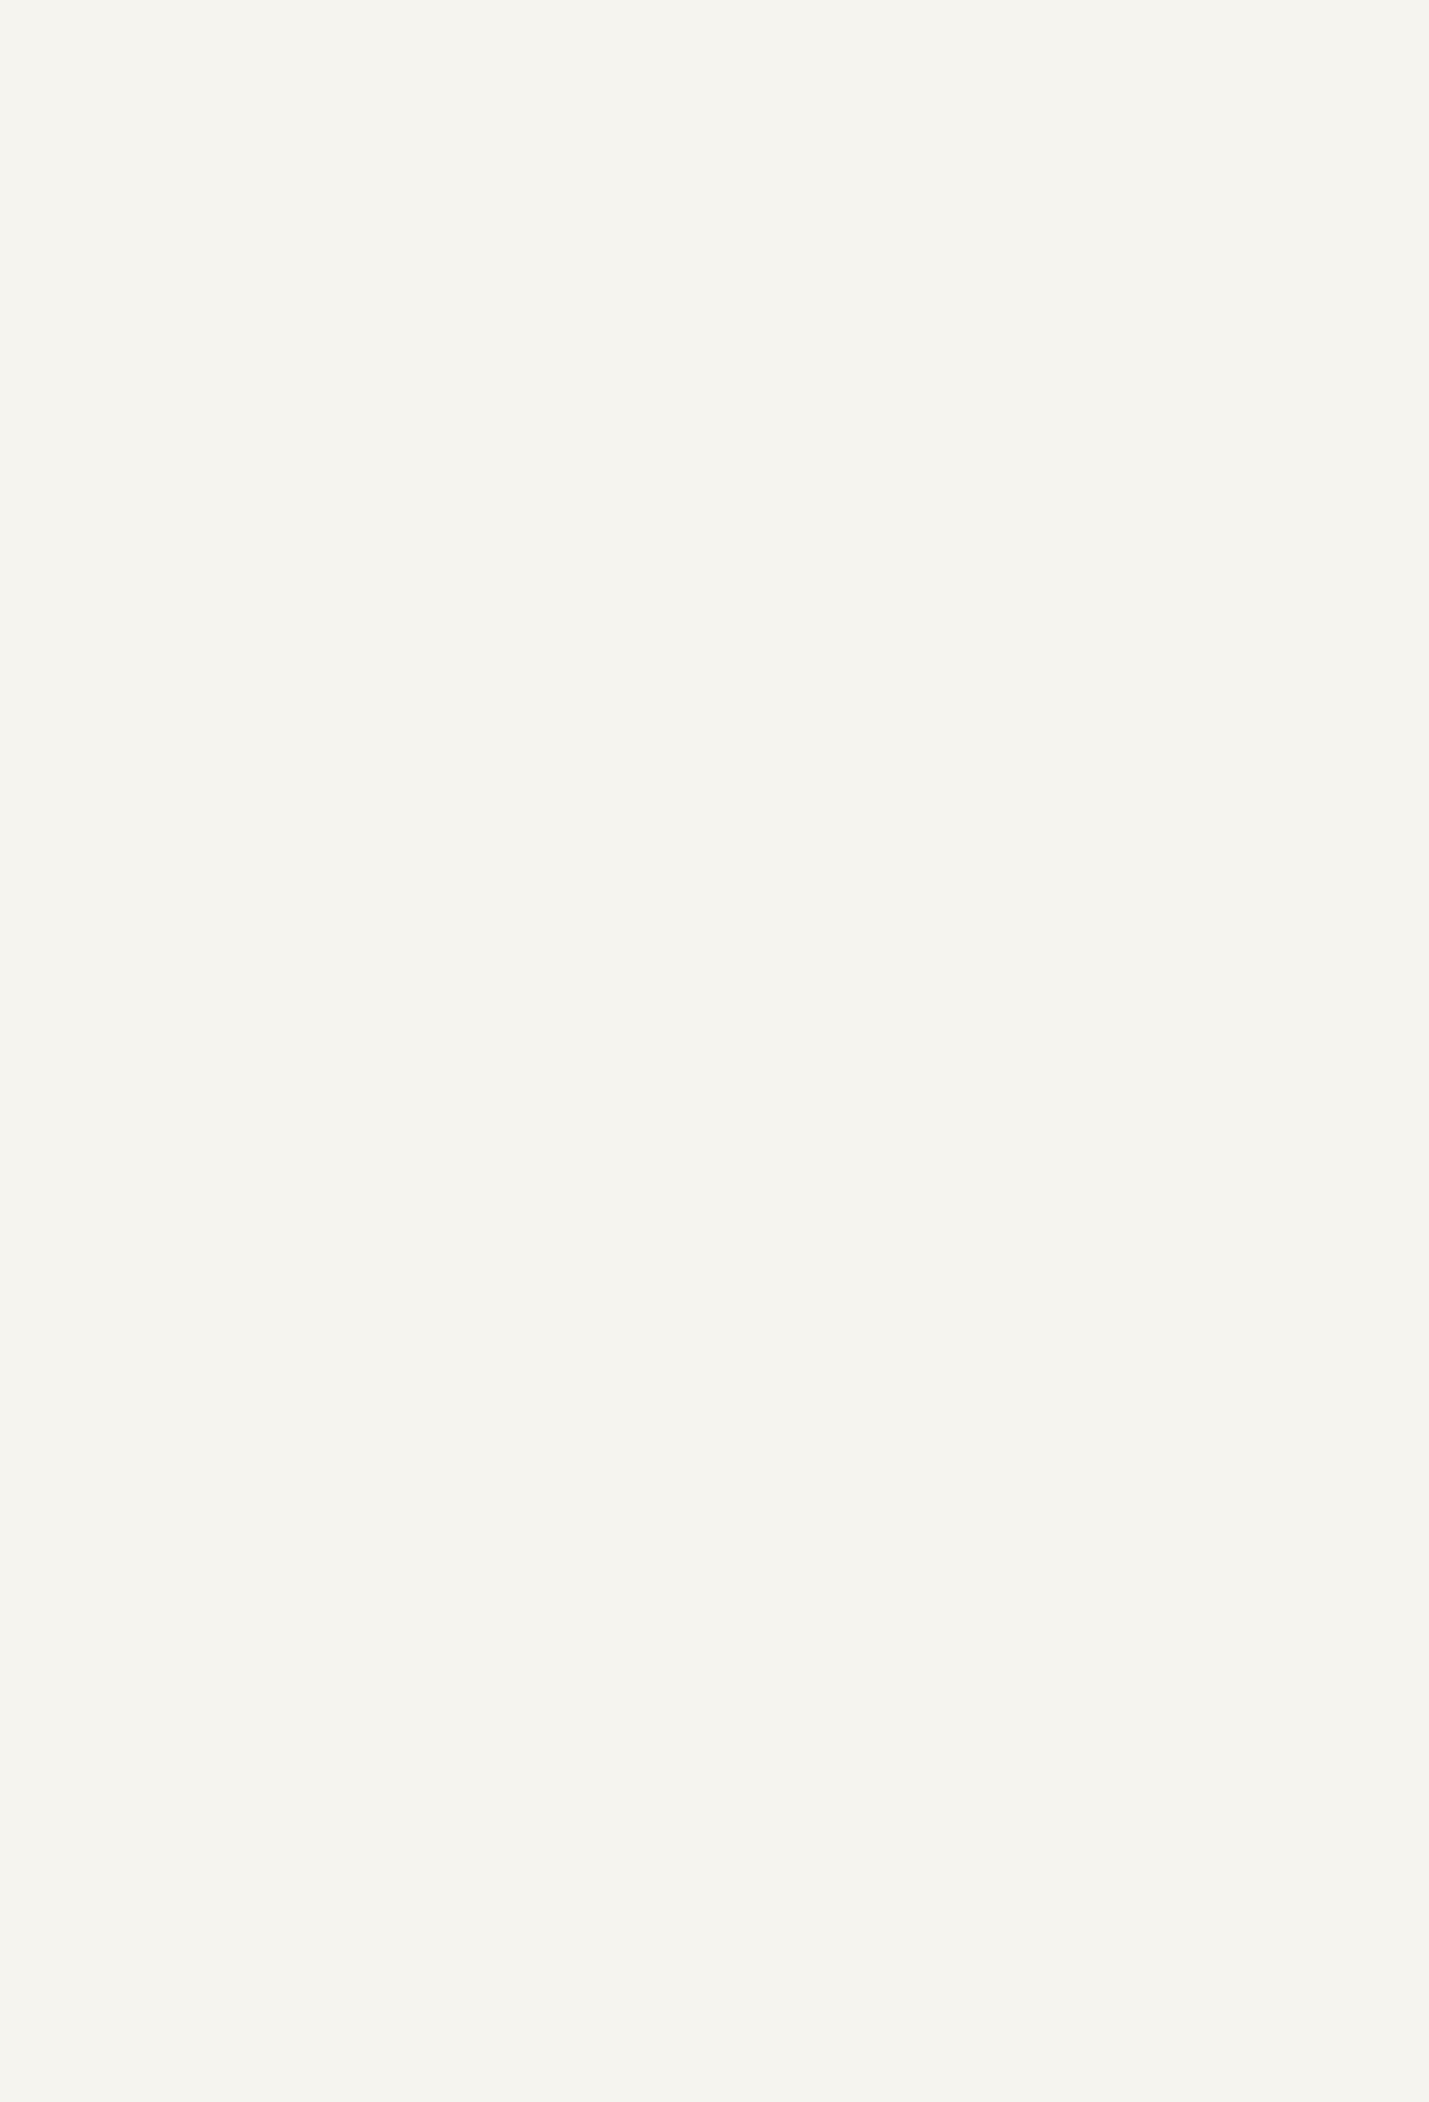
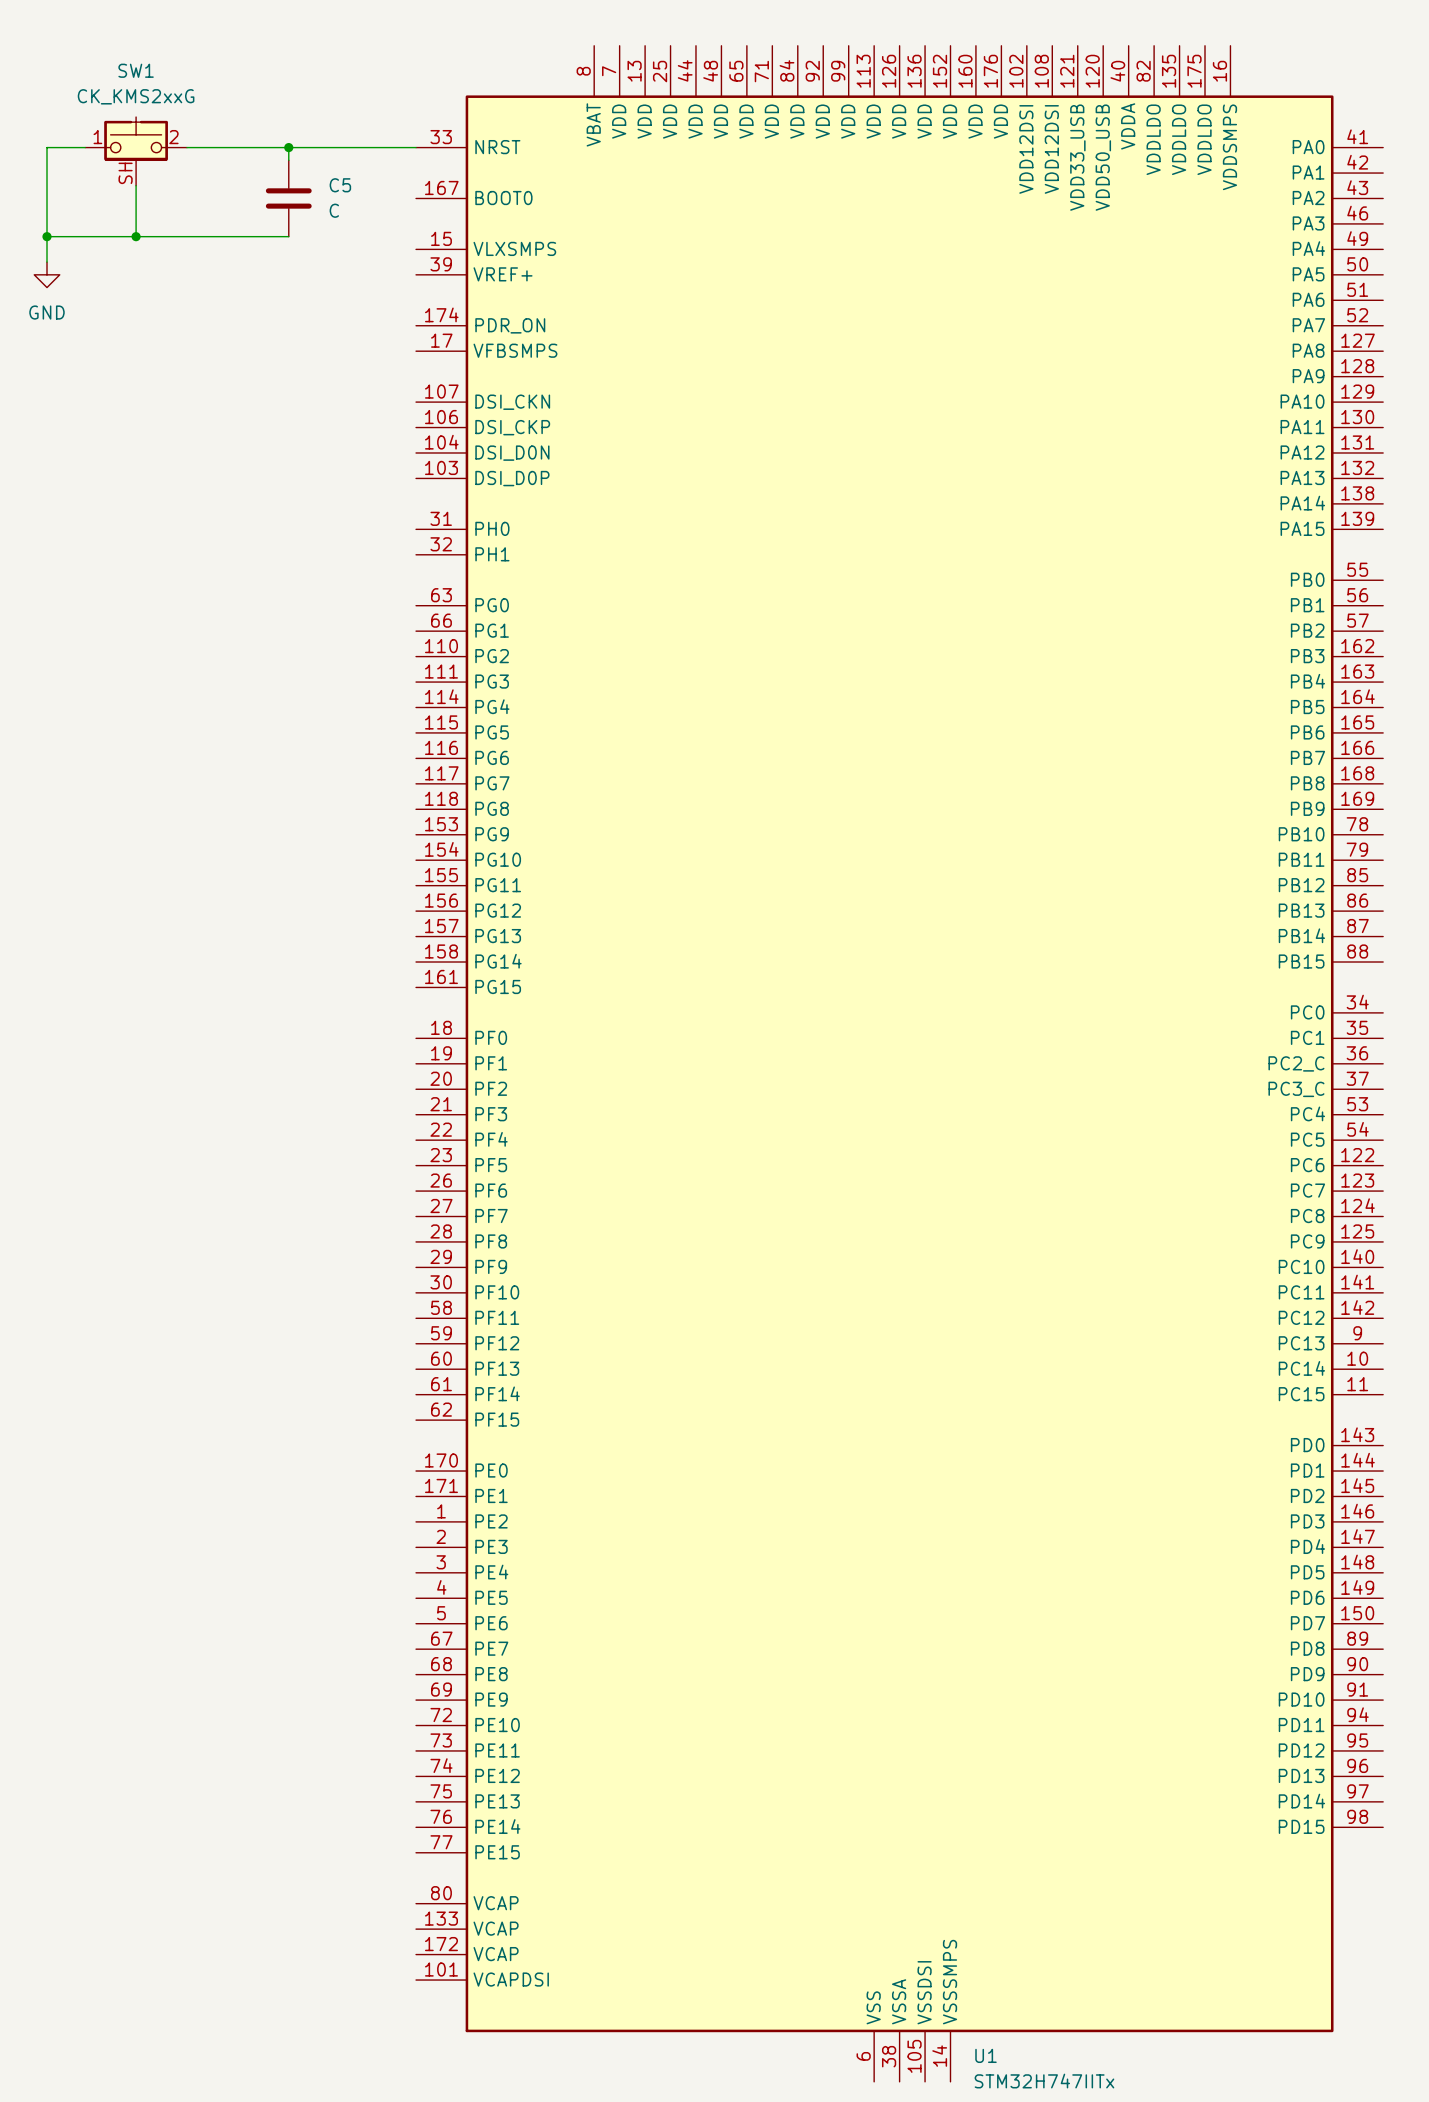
wire: none -> (85, 147) (47, 147) (47, 262)
wire: none -> (186, 147) (416, 147)
wire: none -> (288, 147) (288, 160)
junction: none -> (288, 147)
SW1: none -> CK_KMS2xxG (136, 151)
wire: none -> (136, 185) (136, 236)
C5: none -> C (288, 198)
wire: none -> (47, 236) (288, 236)
junction: none -> (47, 236)
junction: none -> (136, 236)
power symbol: none -> GND (47, 274)
U1: none -> STM32H747IITx (899, 1063)

